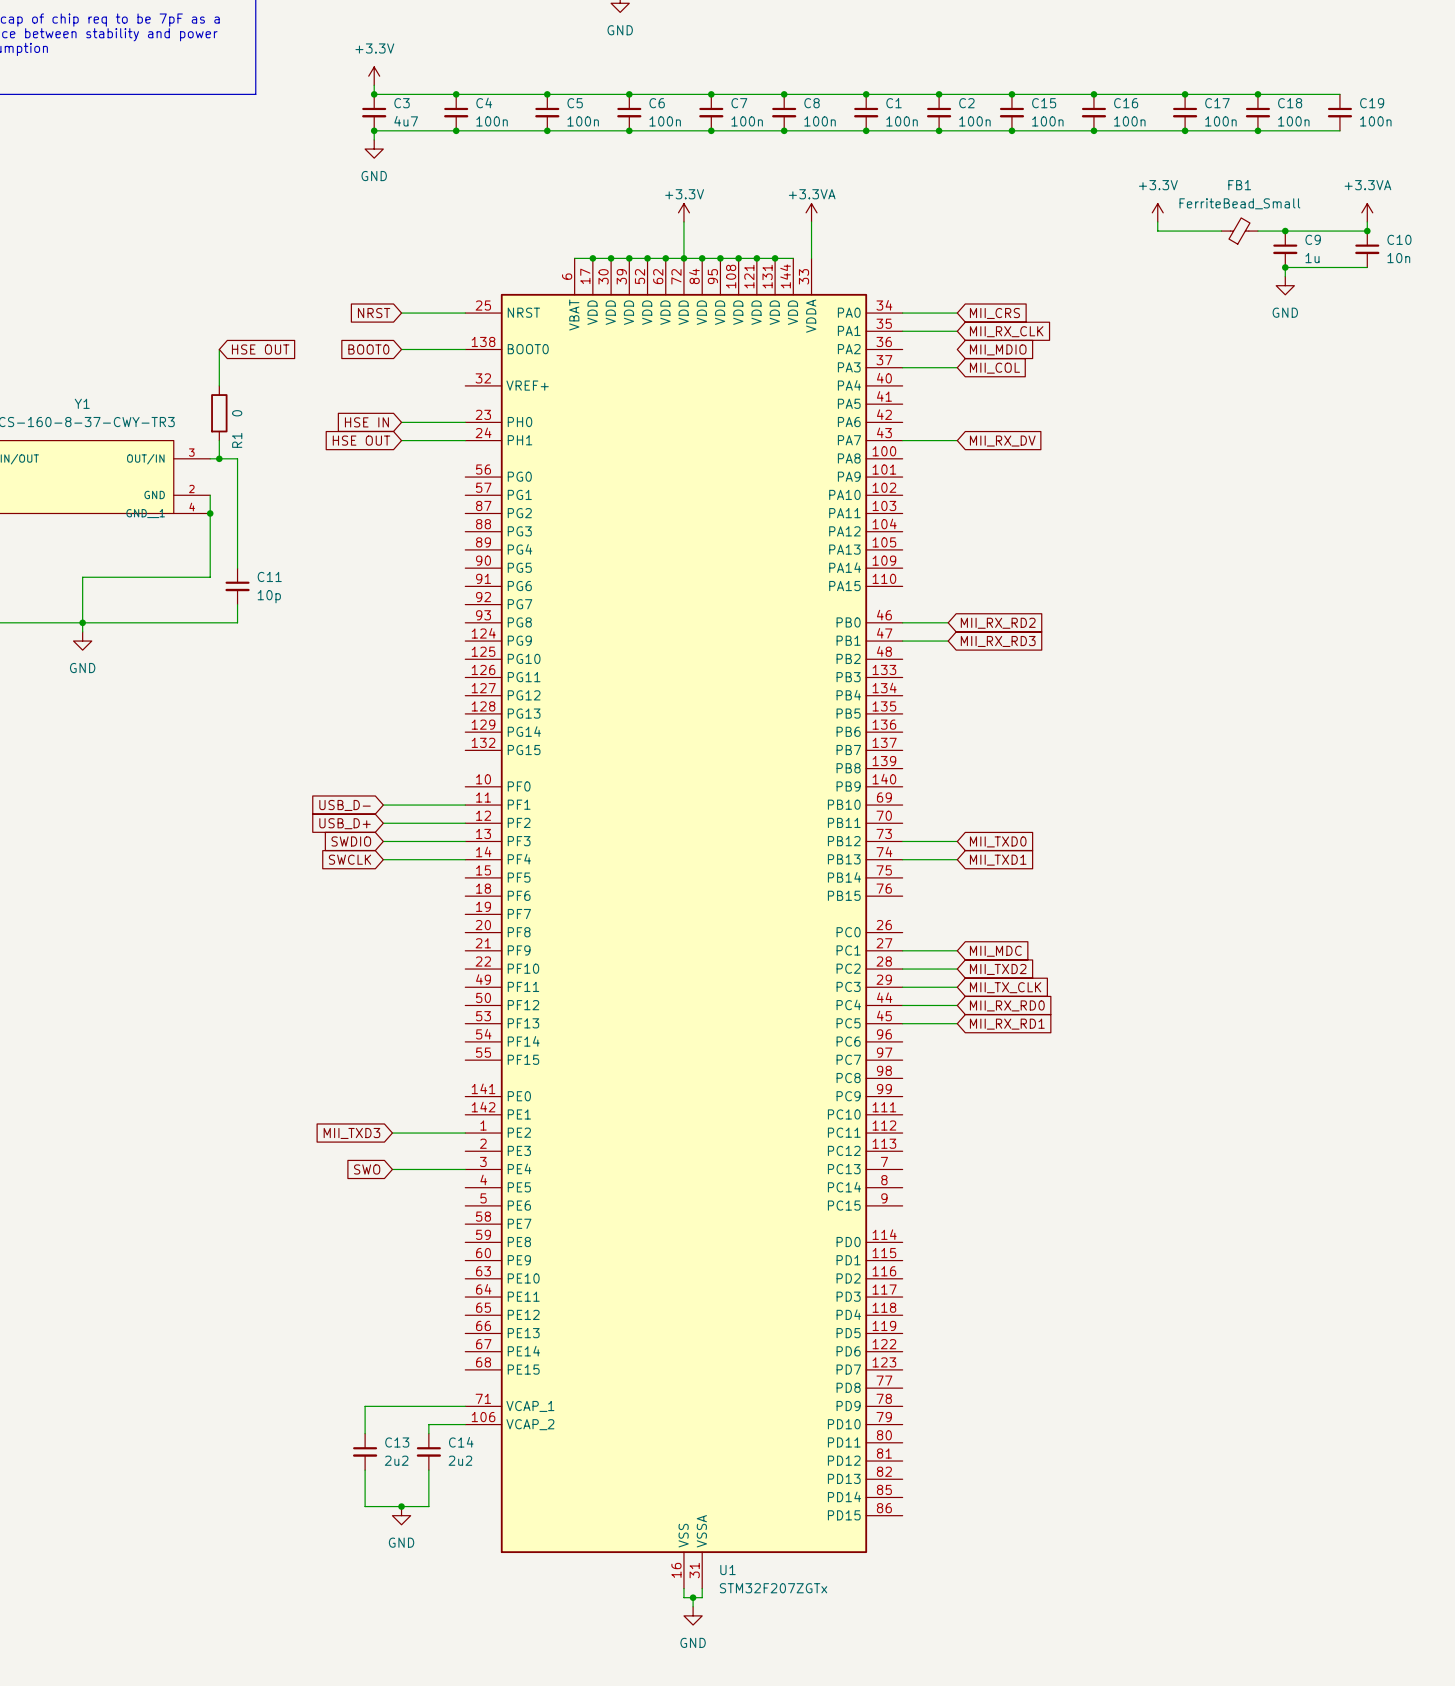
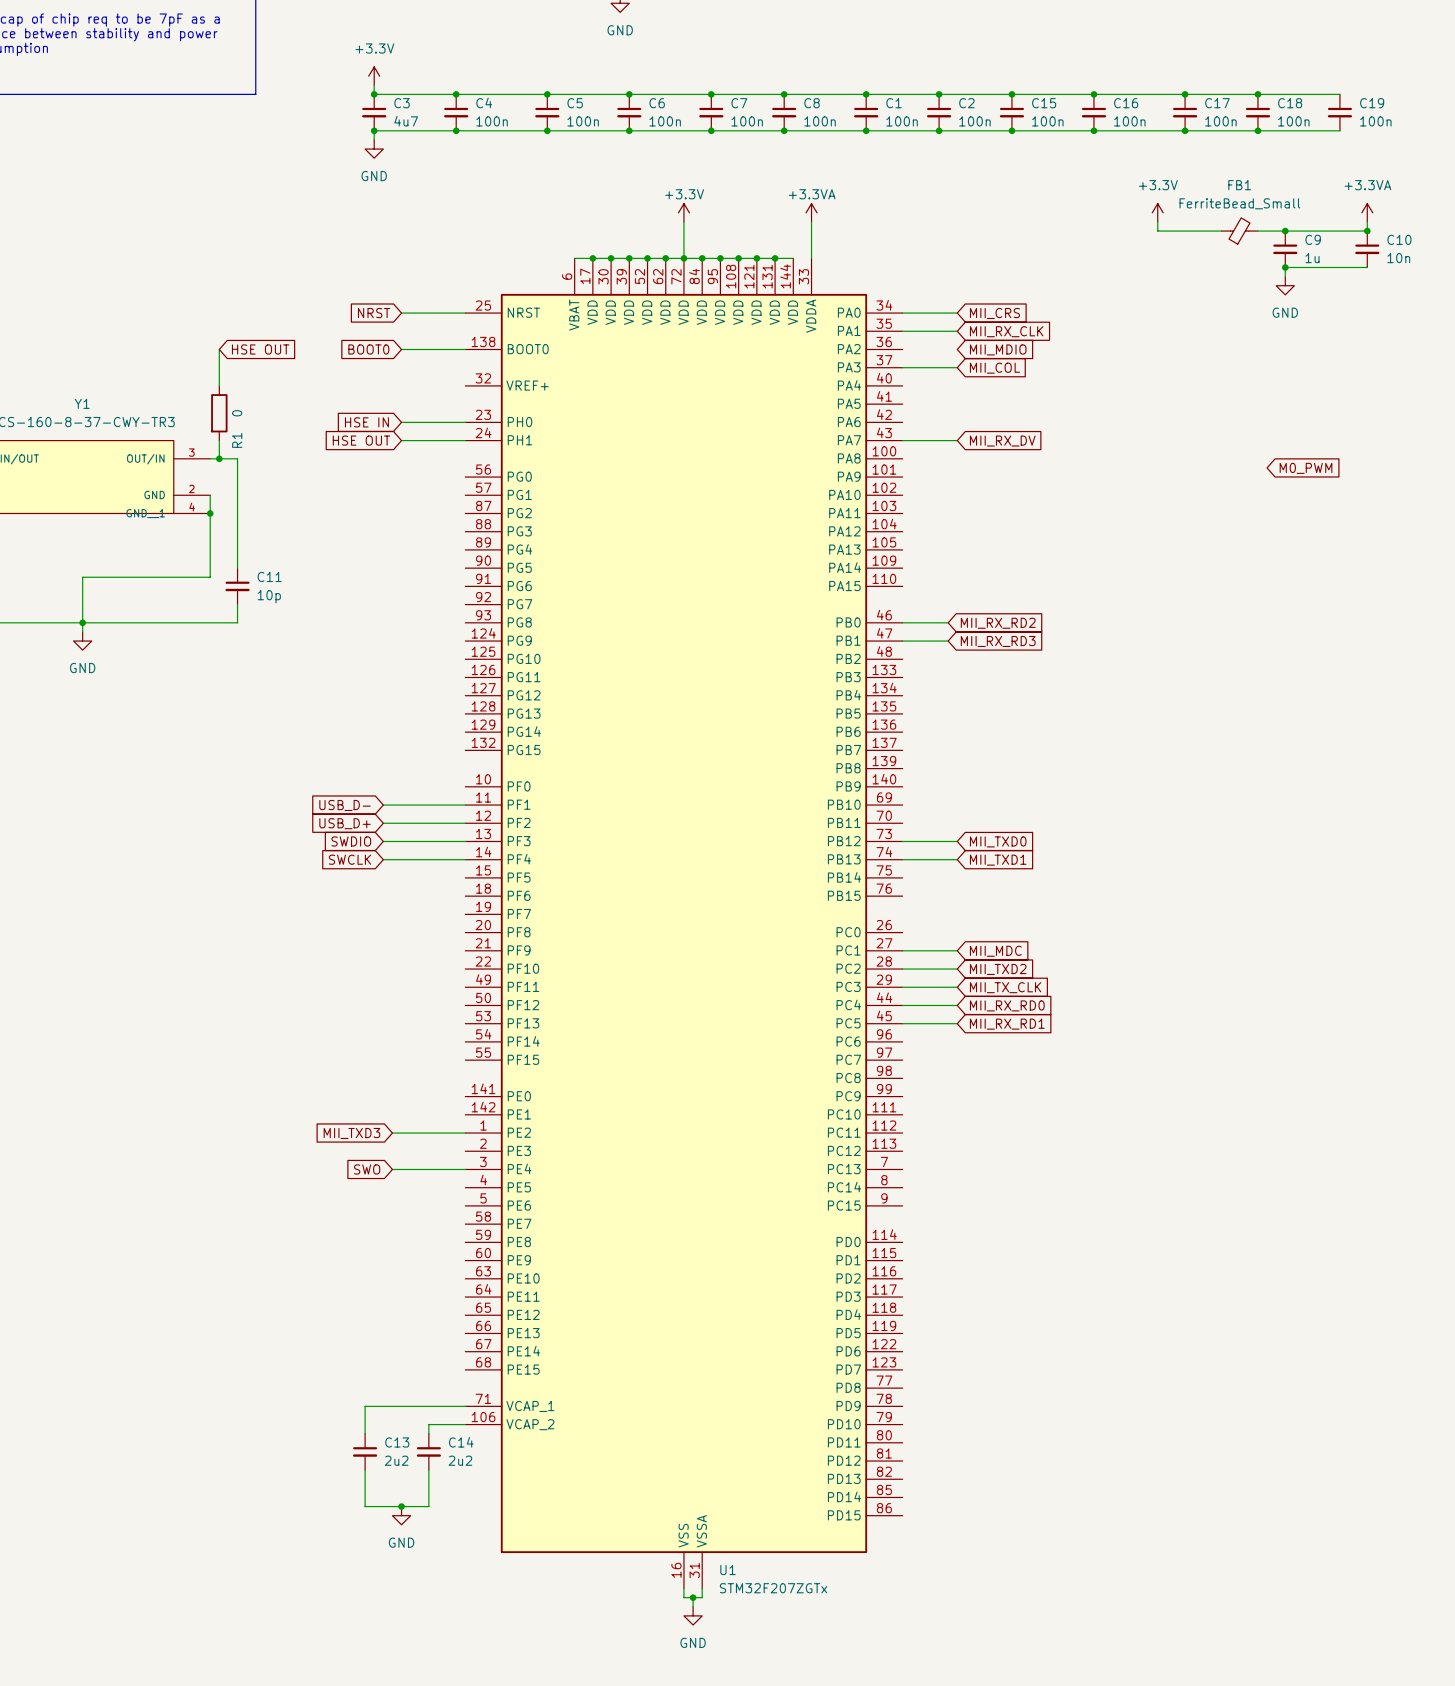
global label: none -> M0_PWM (1306, 468)

